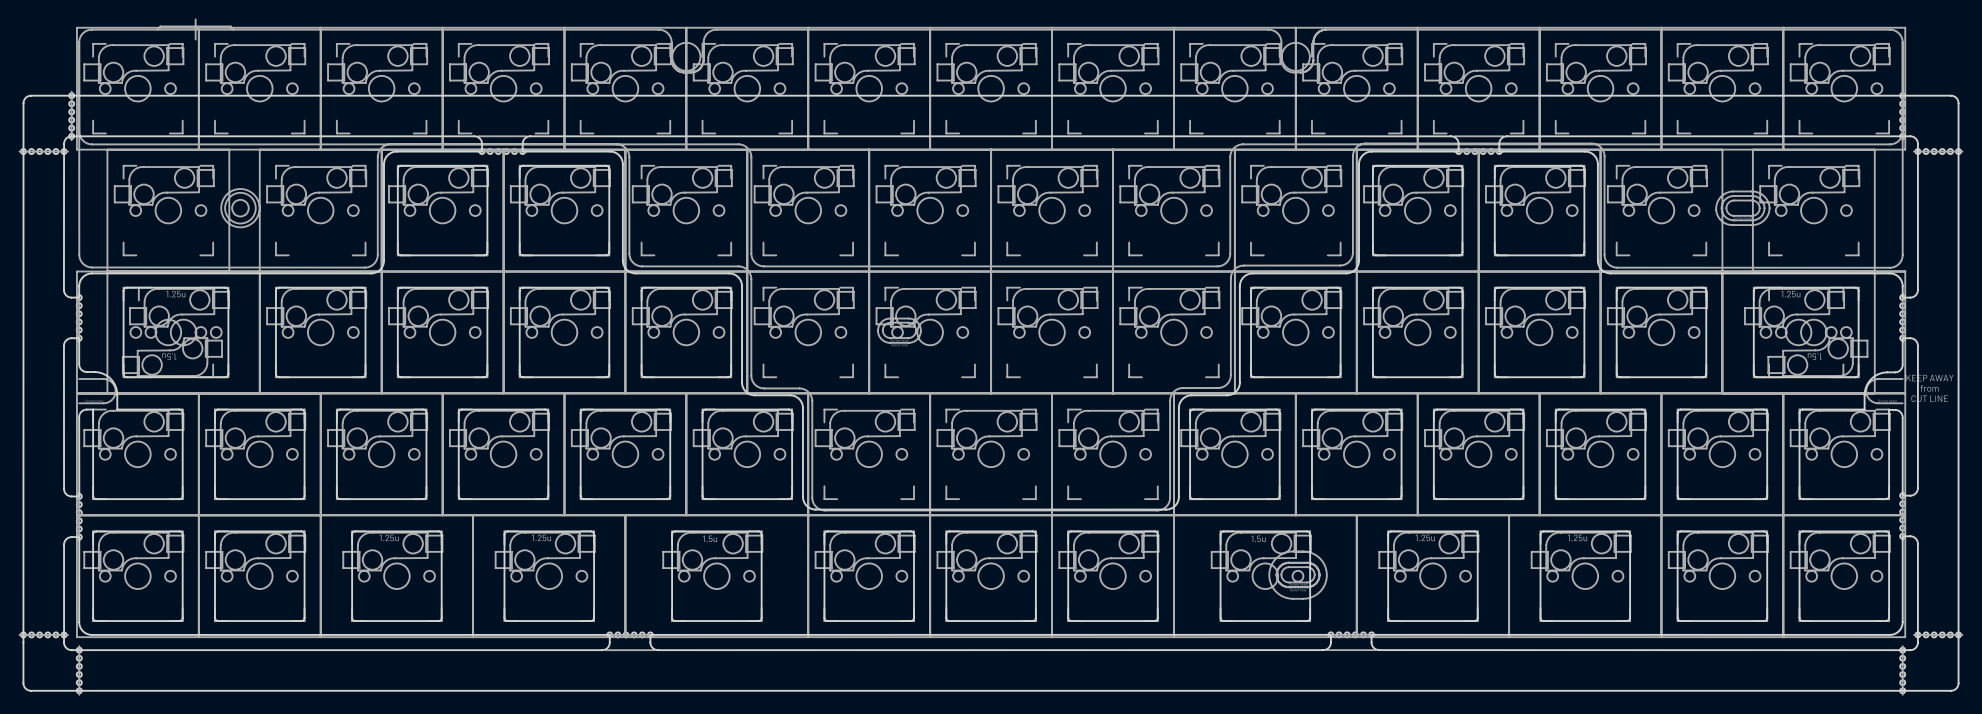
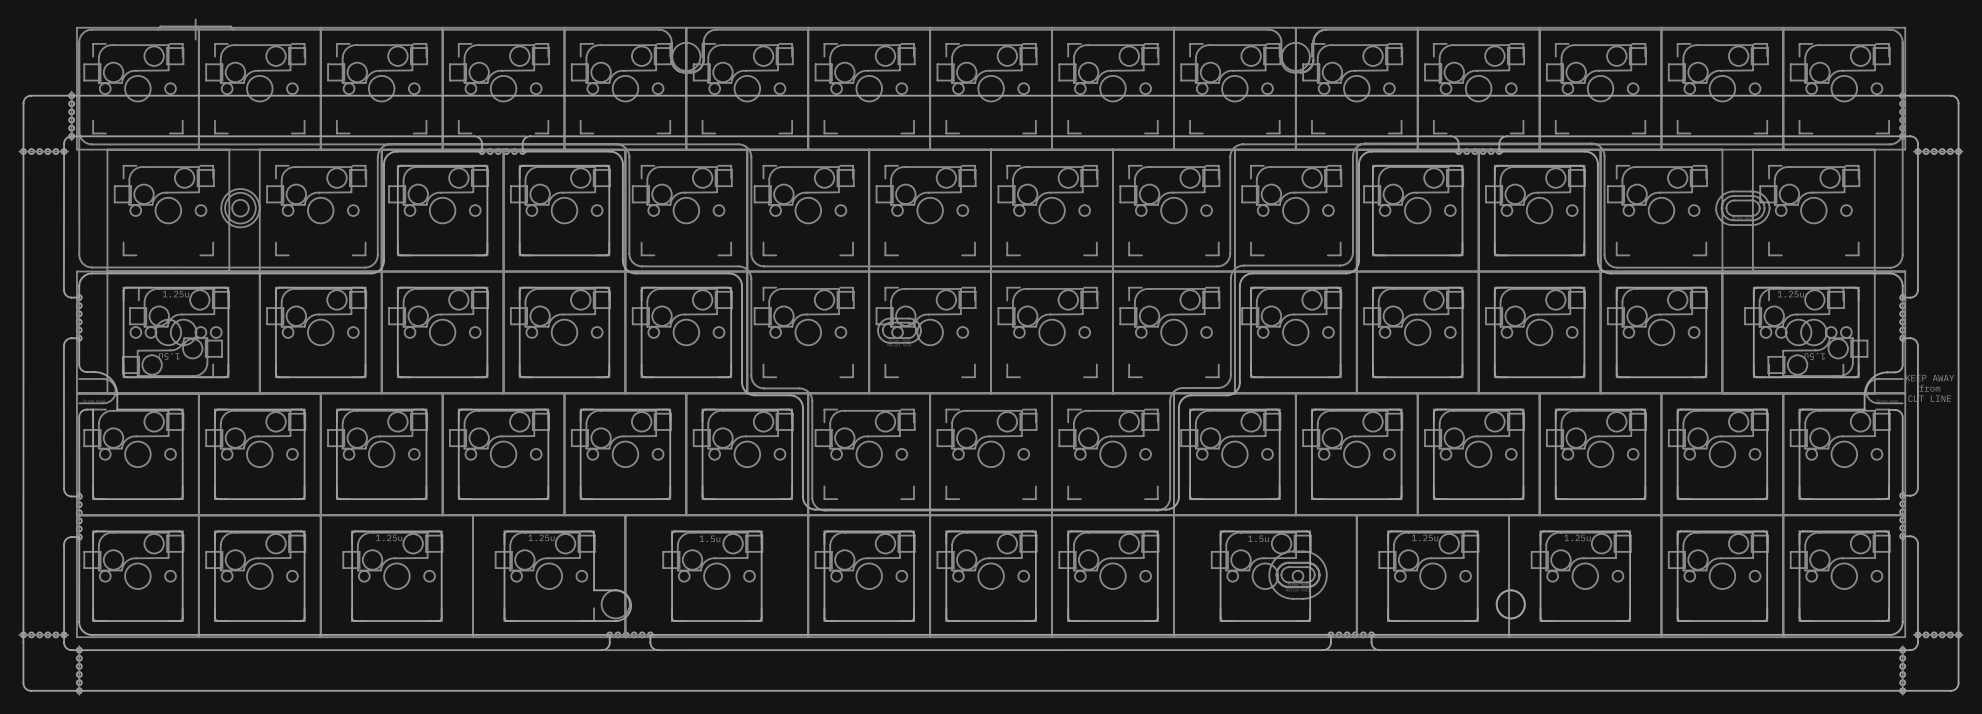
part footprint: [18, 18, 1964, 696] -> [18, 18, 1964, 696]

